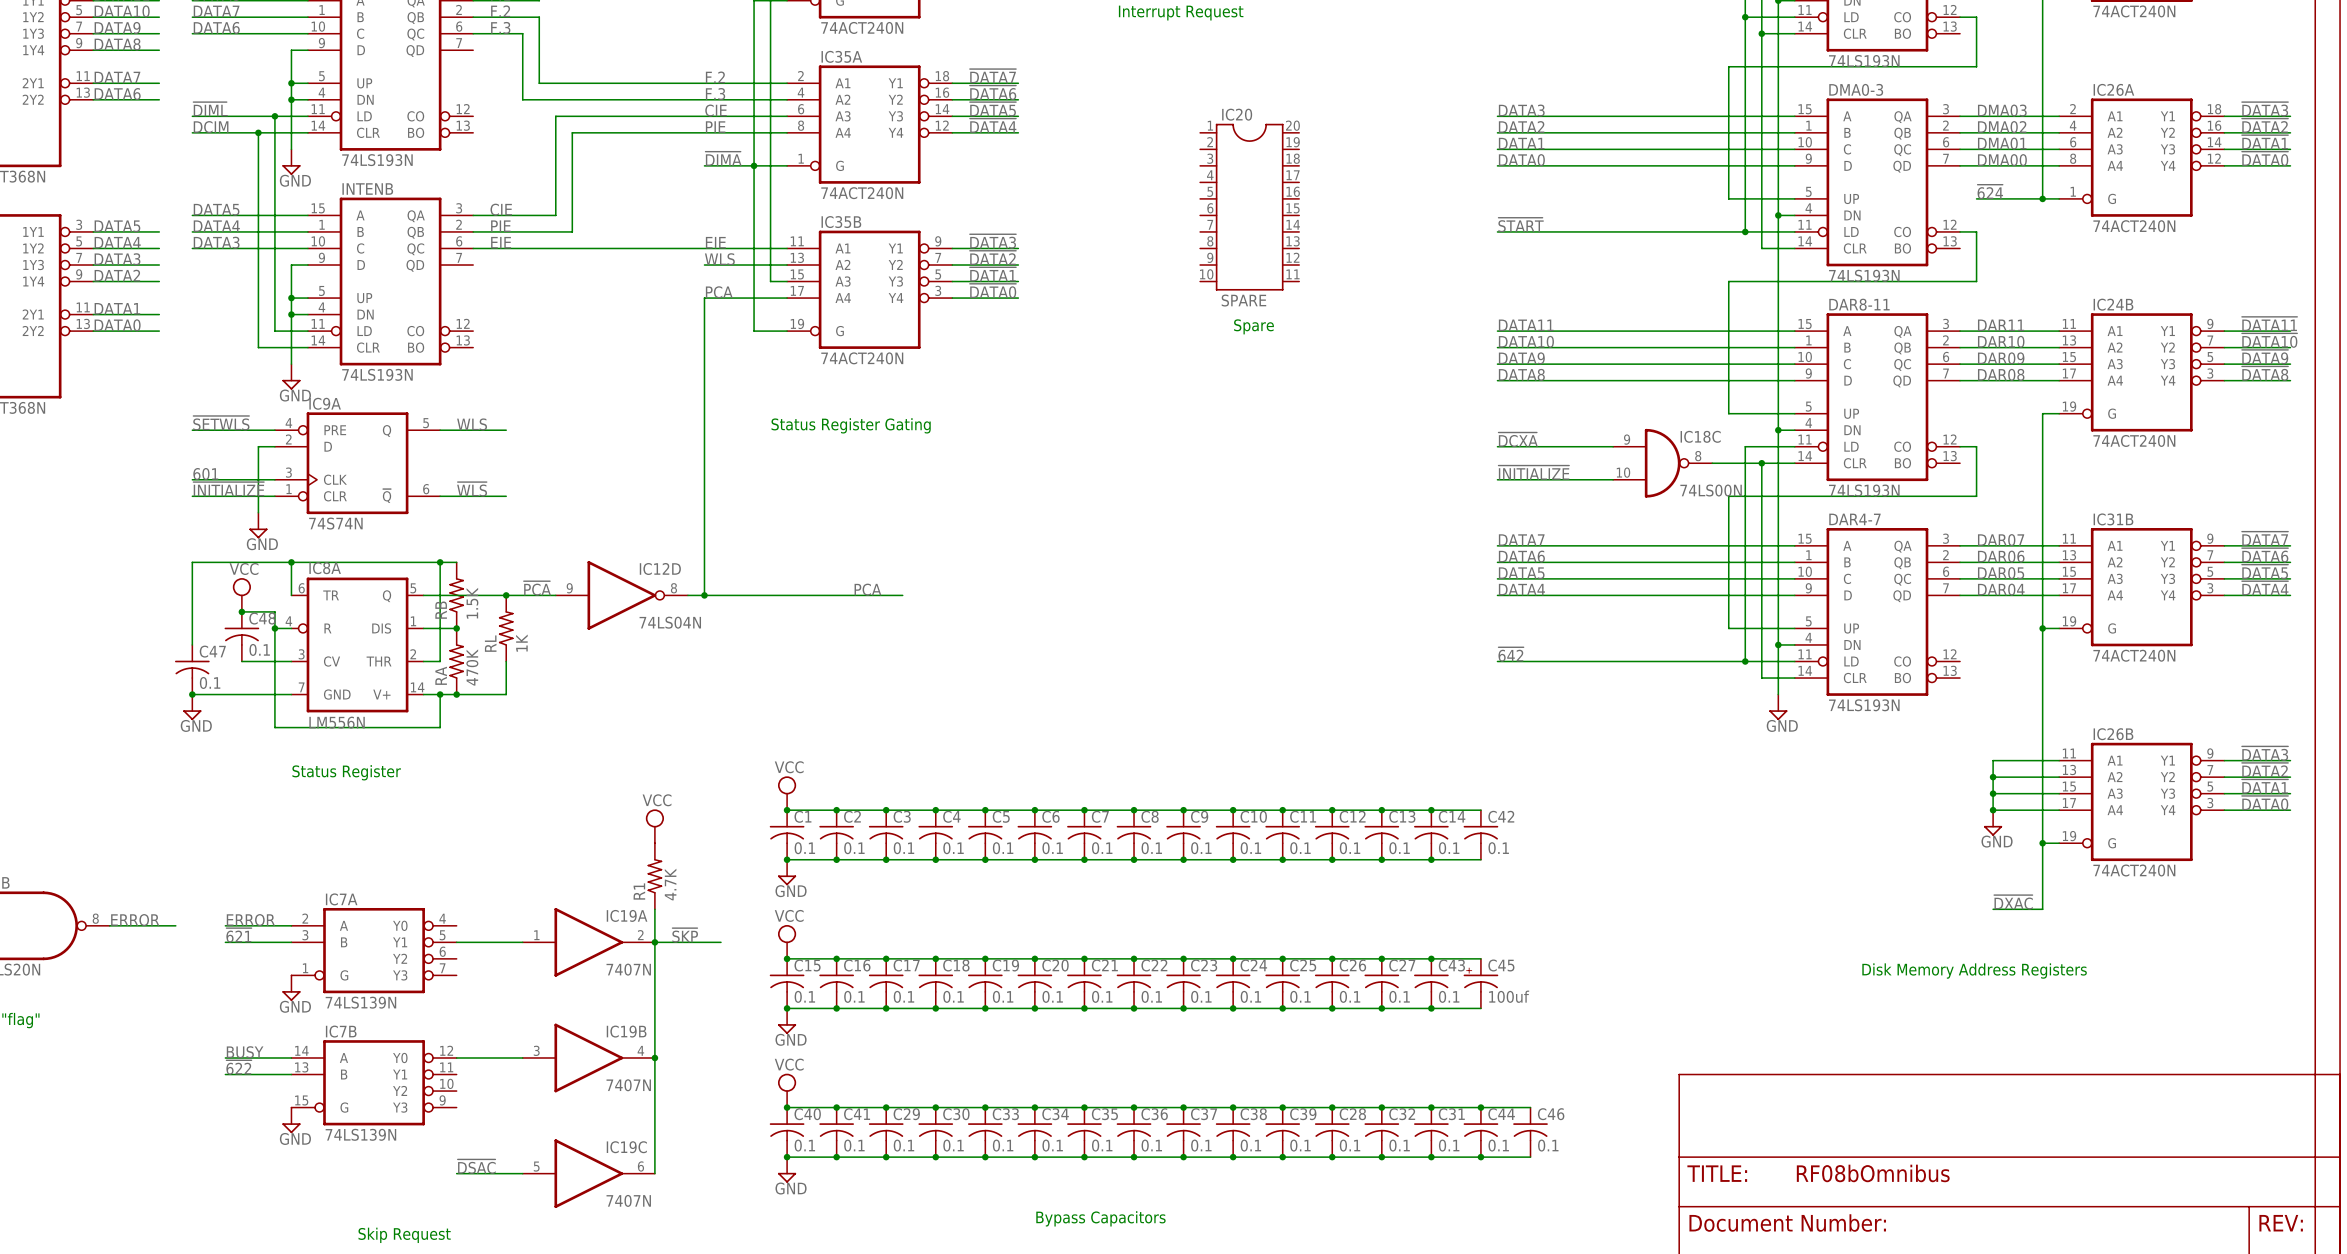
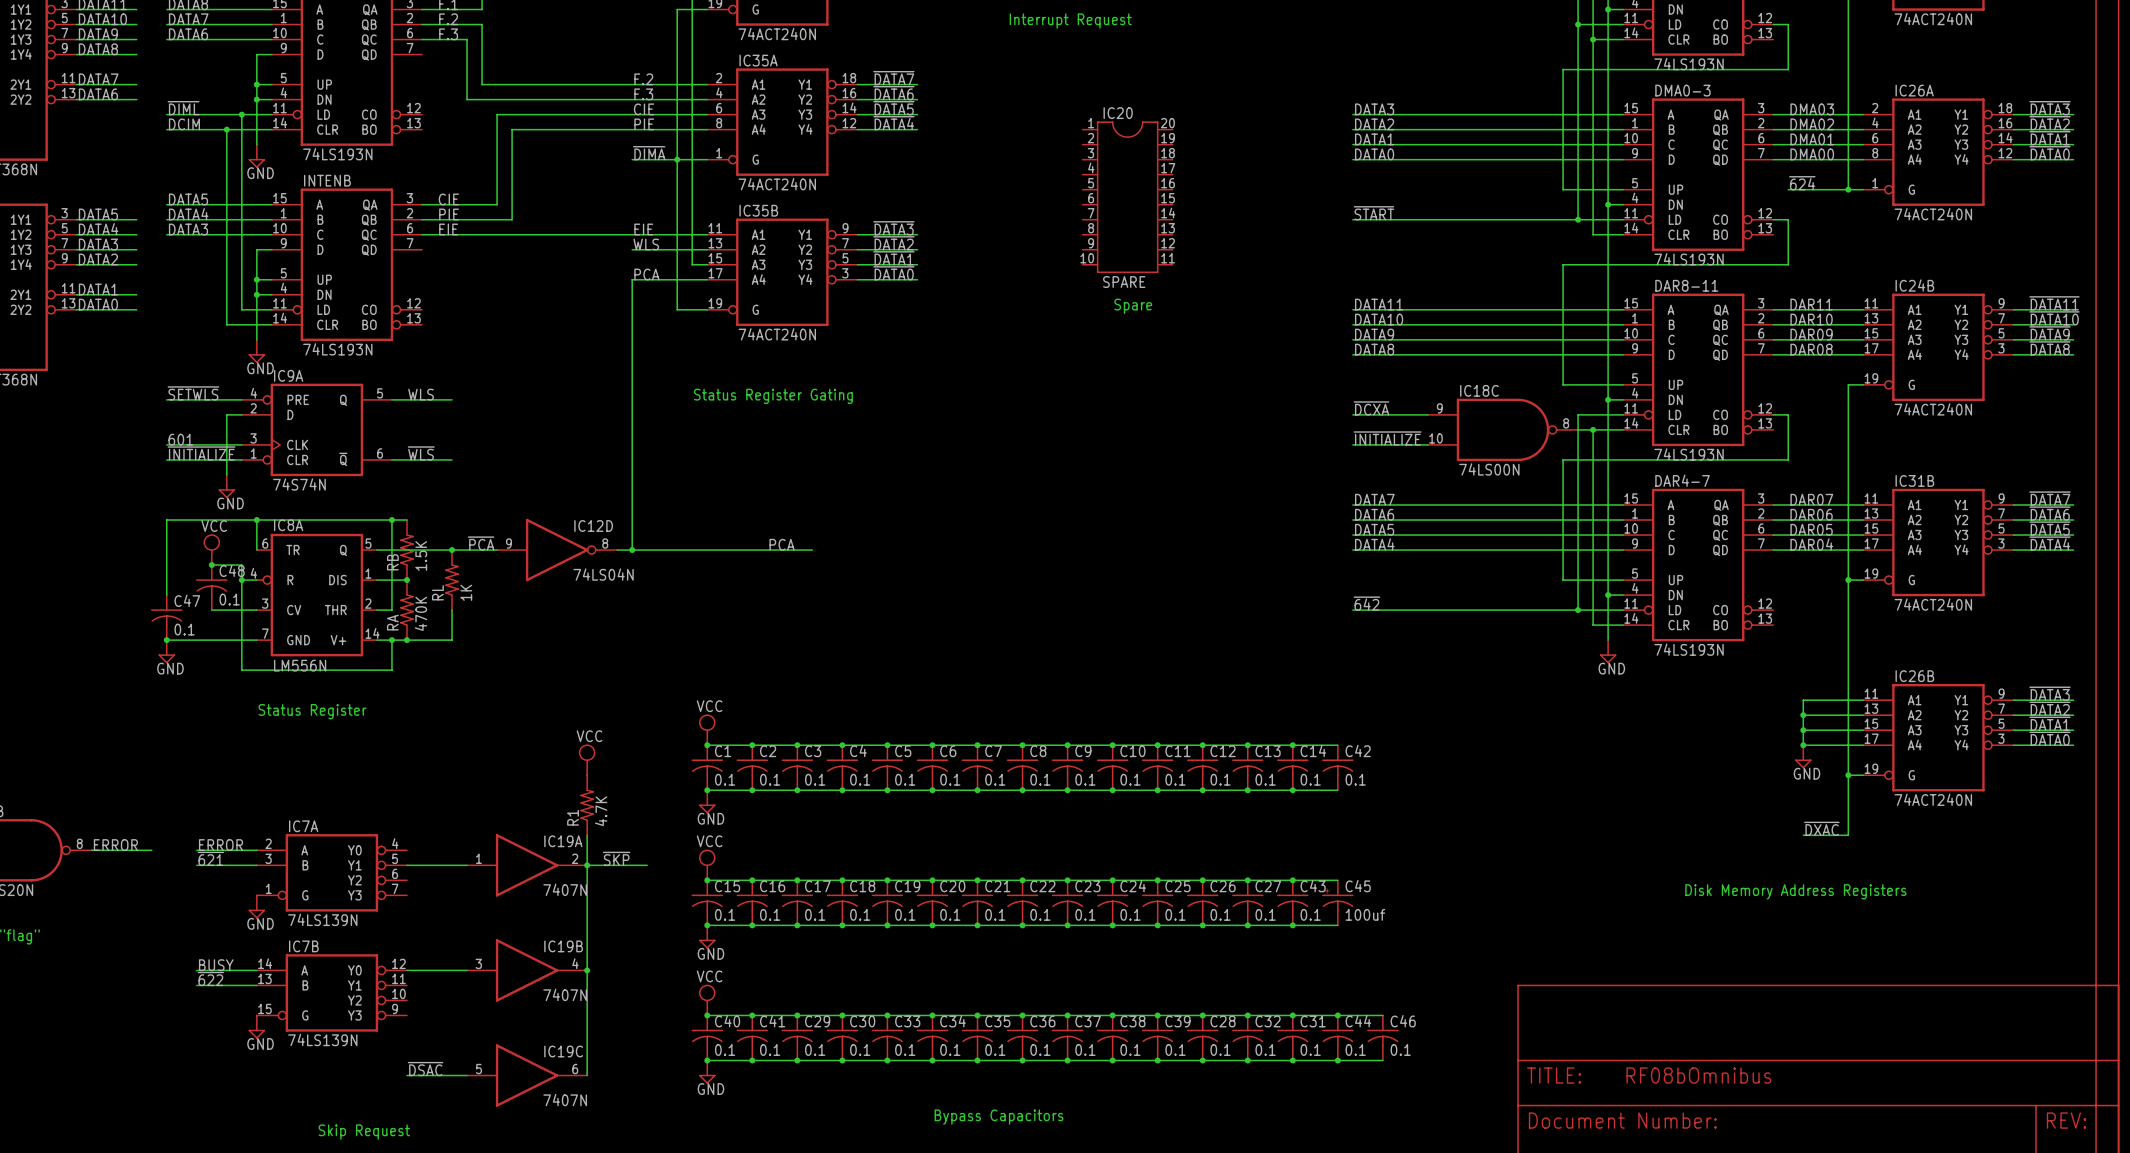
IC18C symbol: [1613, 428, 1713, 498] -> [1427, 398, 1579, 462]
IC18C name position: IC18C (1700, 436) -> IC18C (1479, 390)
IC18C value position: 74LS00N (1711, 490) -> 74LS00N (1489, 469)

